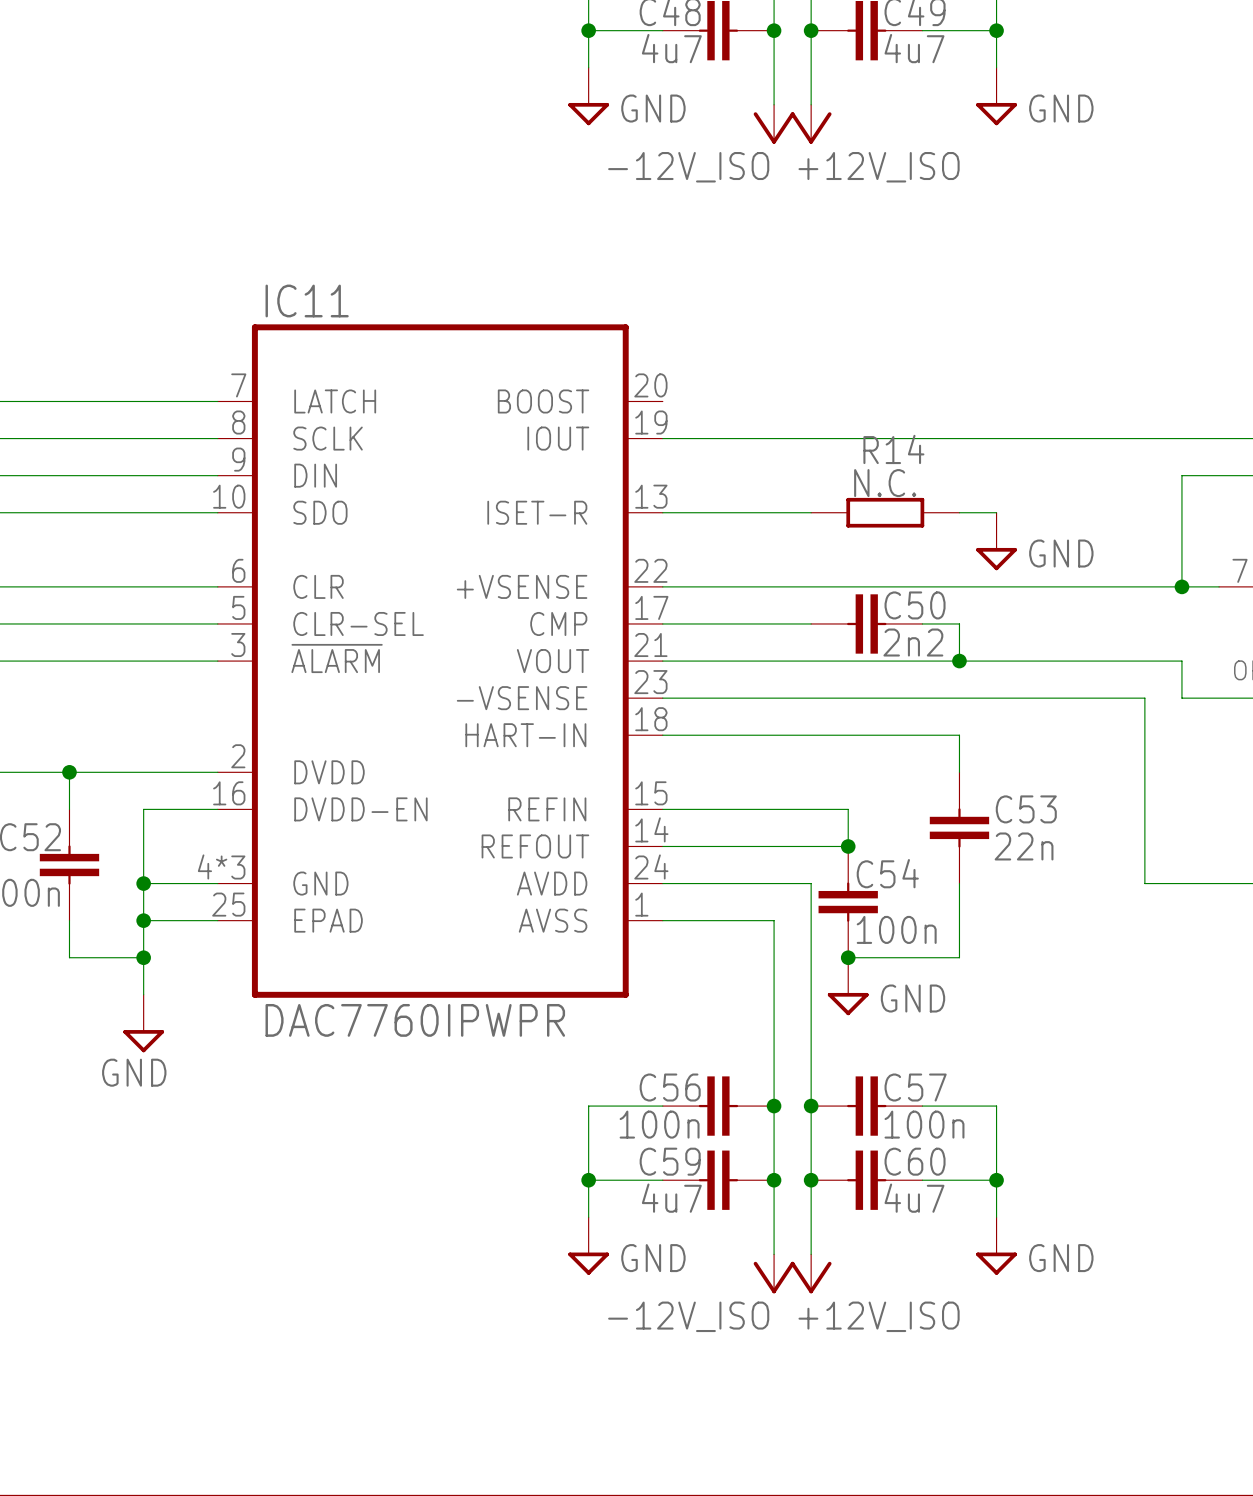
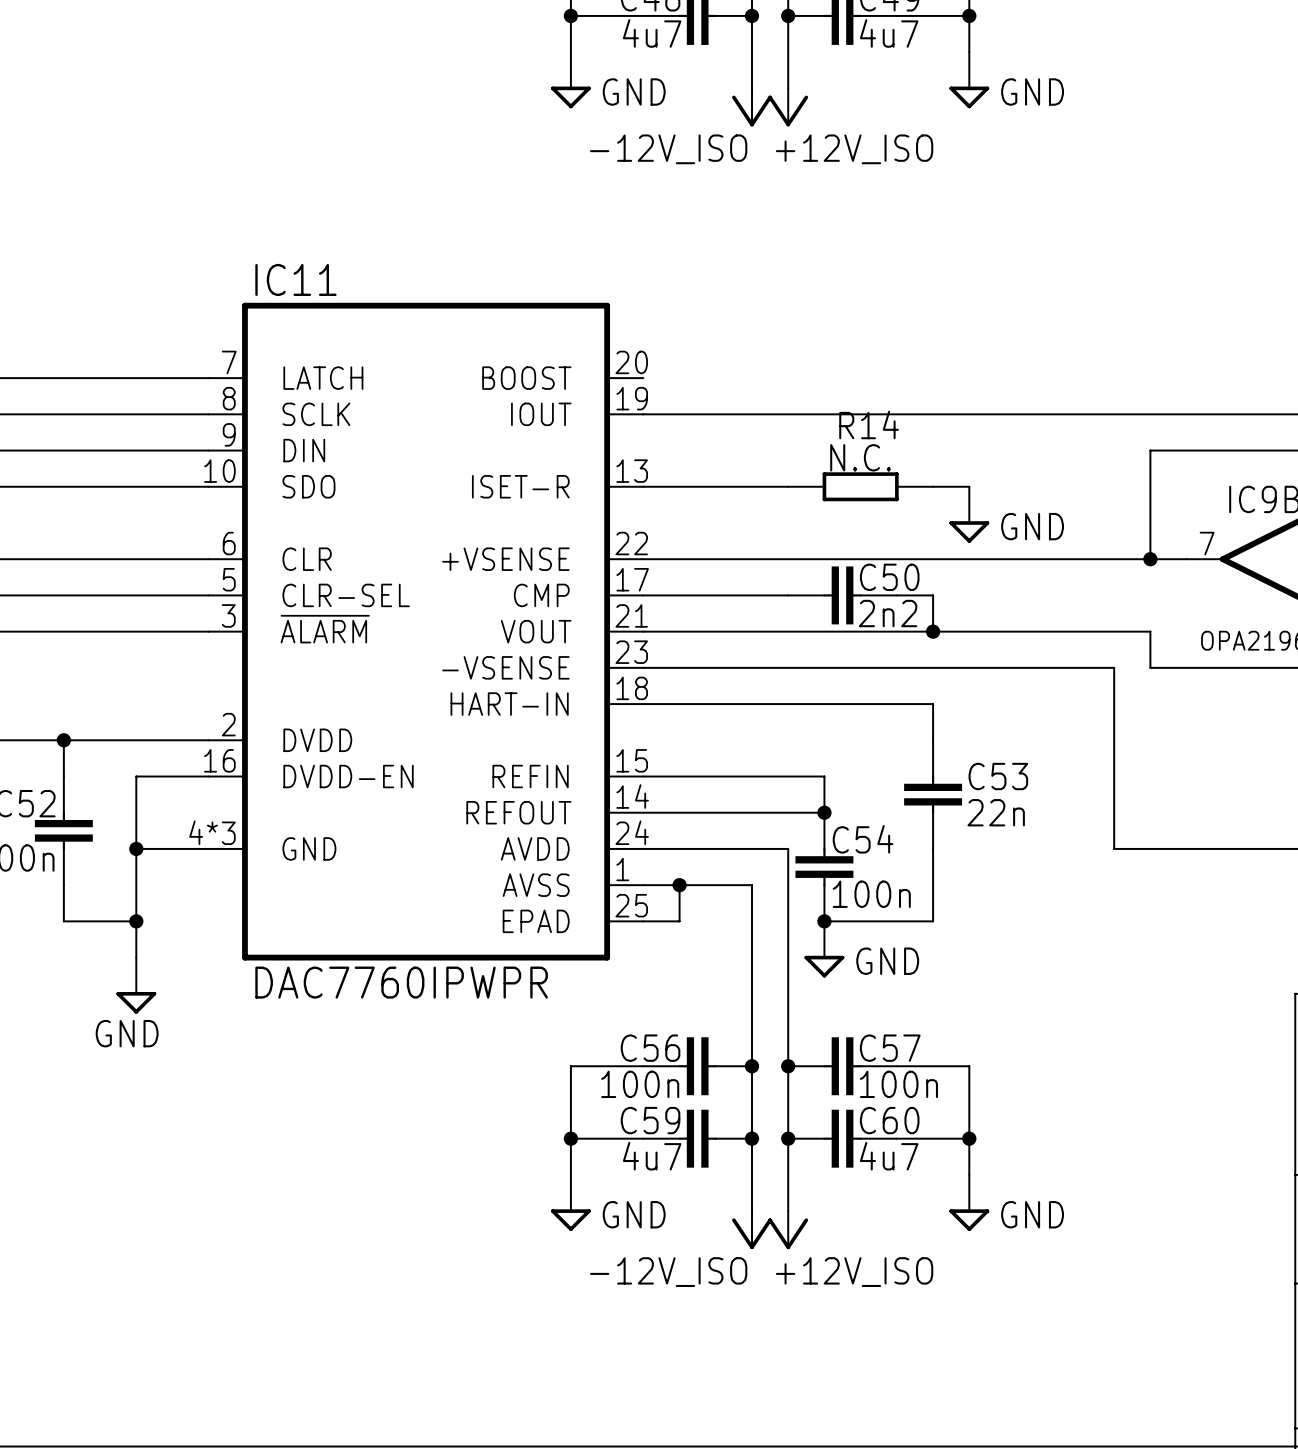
IC11 symbol: [217, 324, 663, 998] -> [208, 302, 644, 961]
wire: (143, 920) (217, 920) -> none
junction: (143, 920) -> none
wire: none -> (679, 885) (679, 921) (643, 921)
junction: none -> (679, 885)

